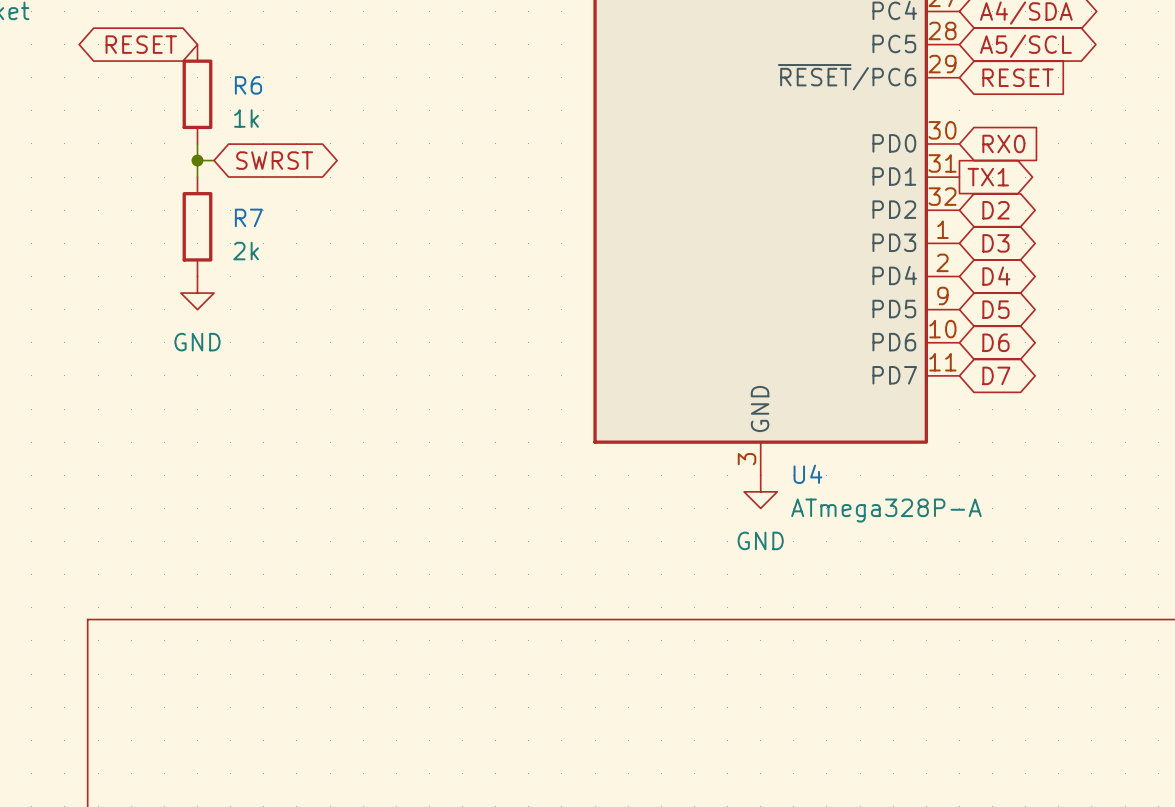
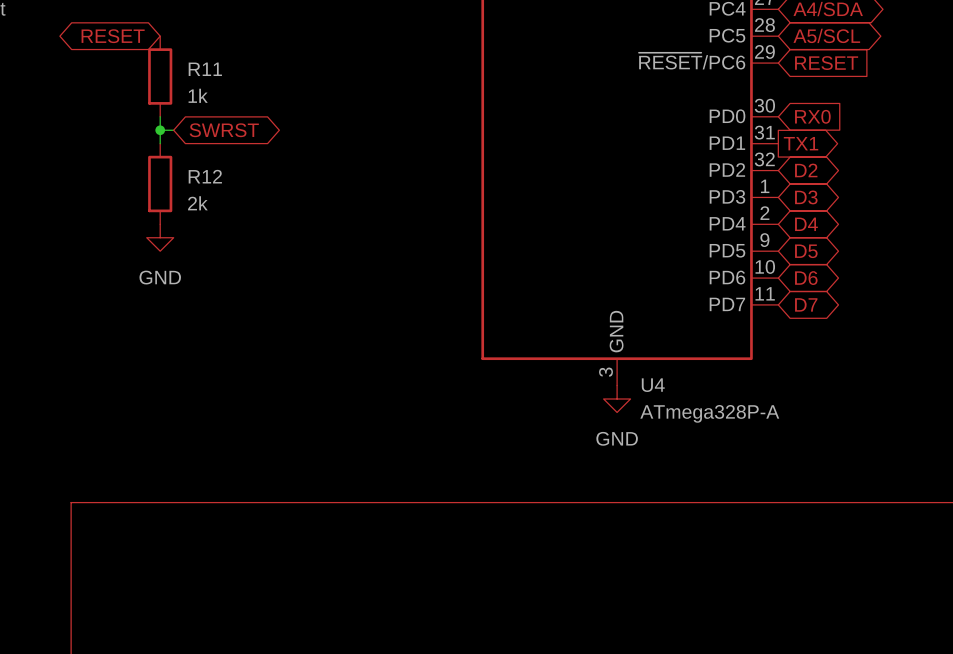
R6 name: R6 (248, 85) -> R11 (205, 69)
R7 name: R7 (248, 217) -> R12 (205, 176)

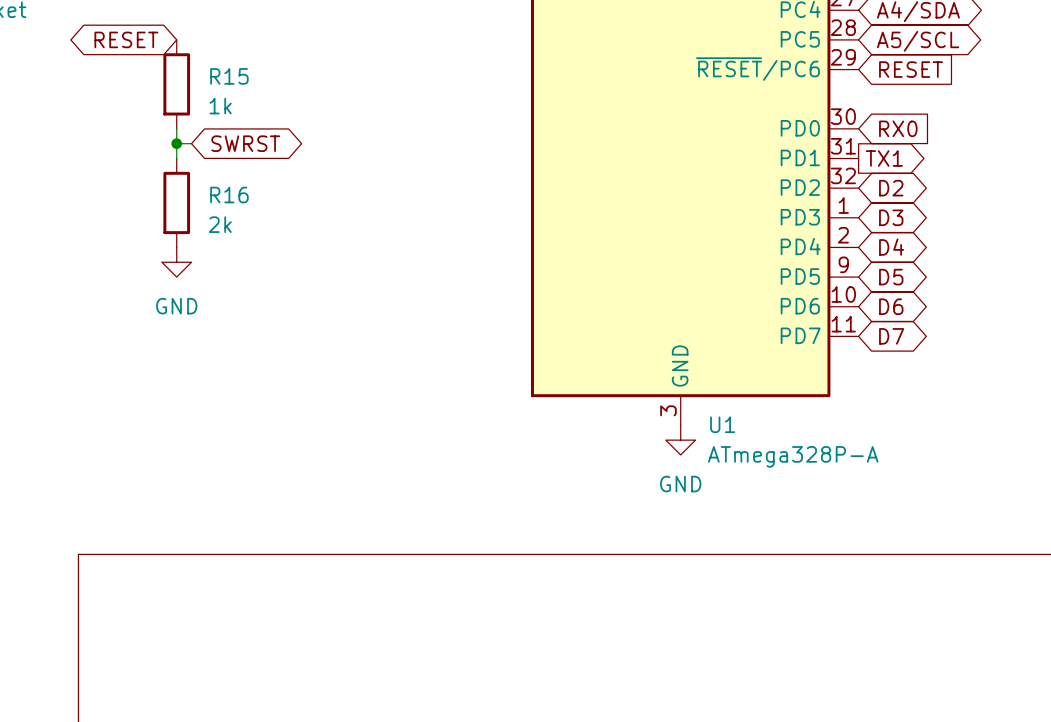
R11 name: R11 (205, 69) -> R15 (229, 76)
R12 name: R12 (205, 176) -> R16 (229, 195)
U4 name: U4 (653, 385) -> U1 (722, 424)

